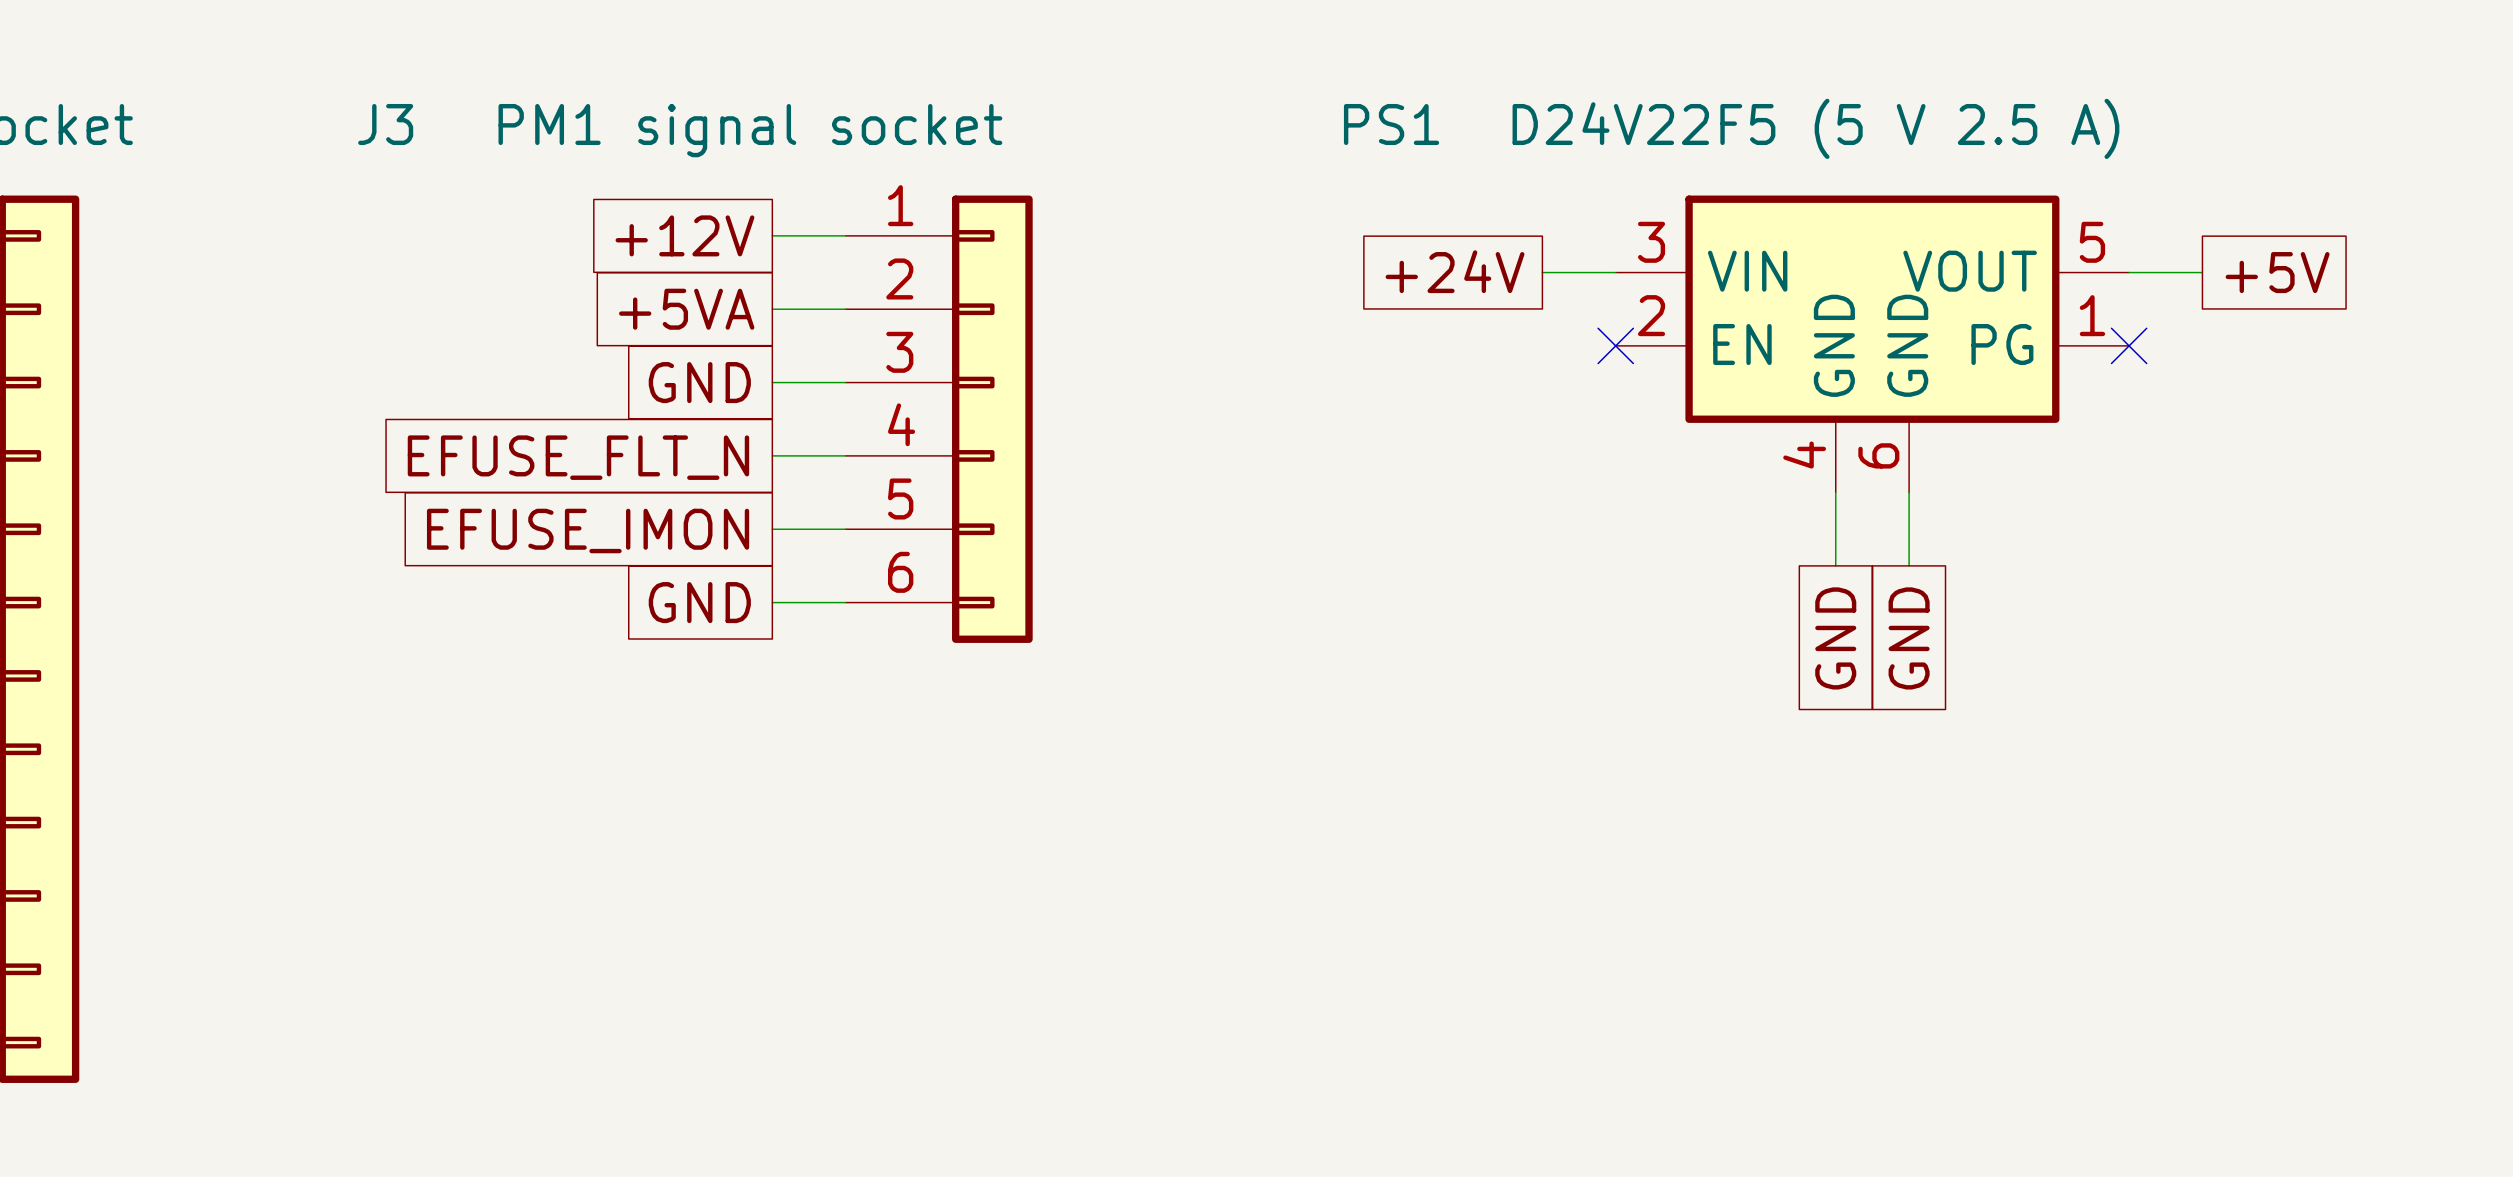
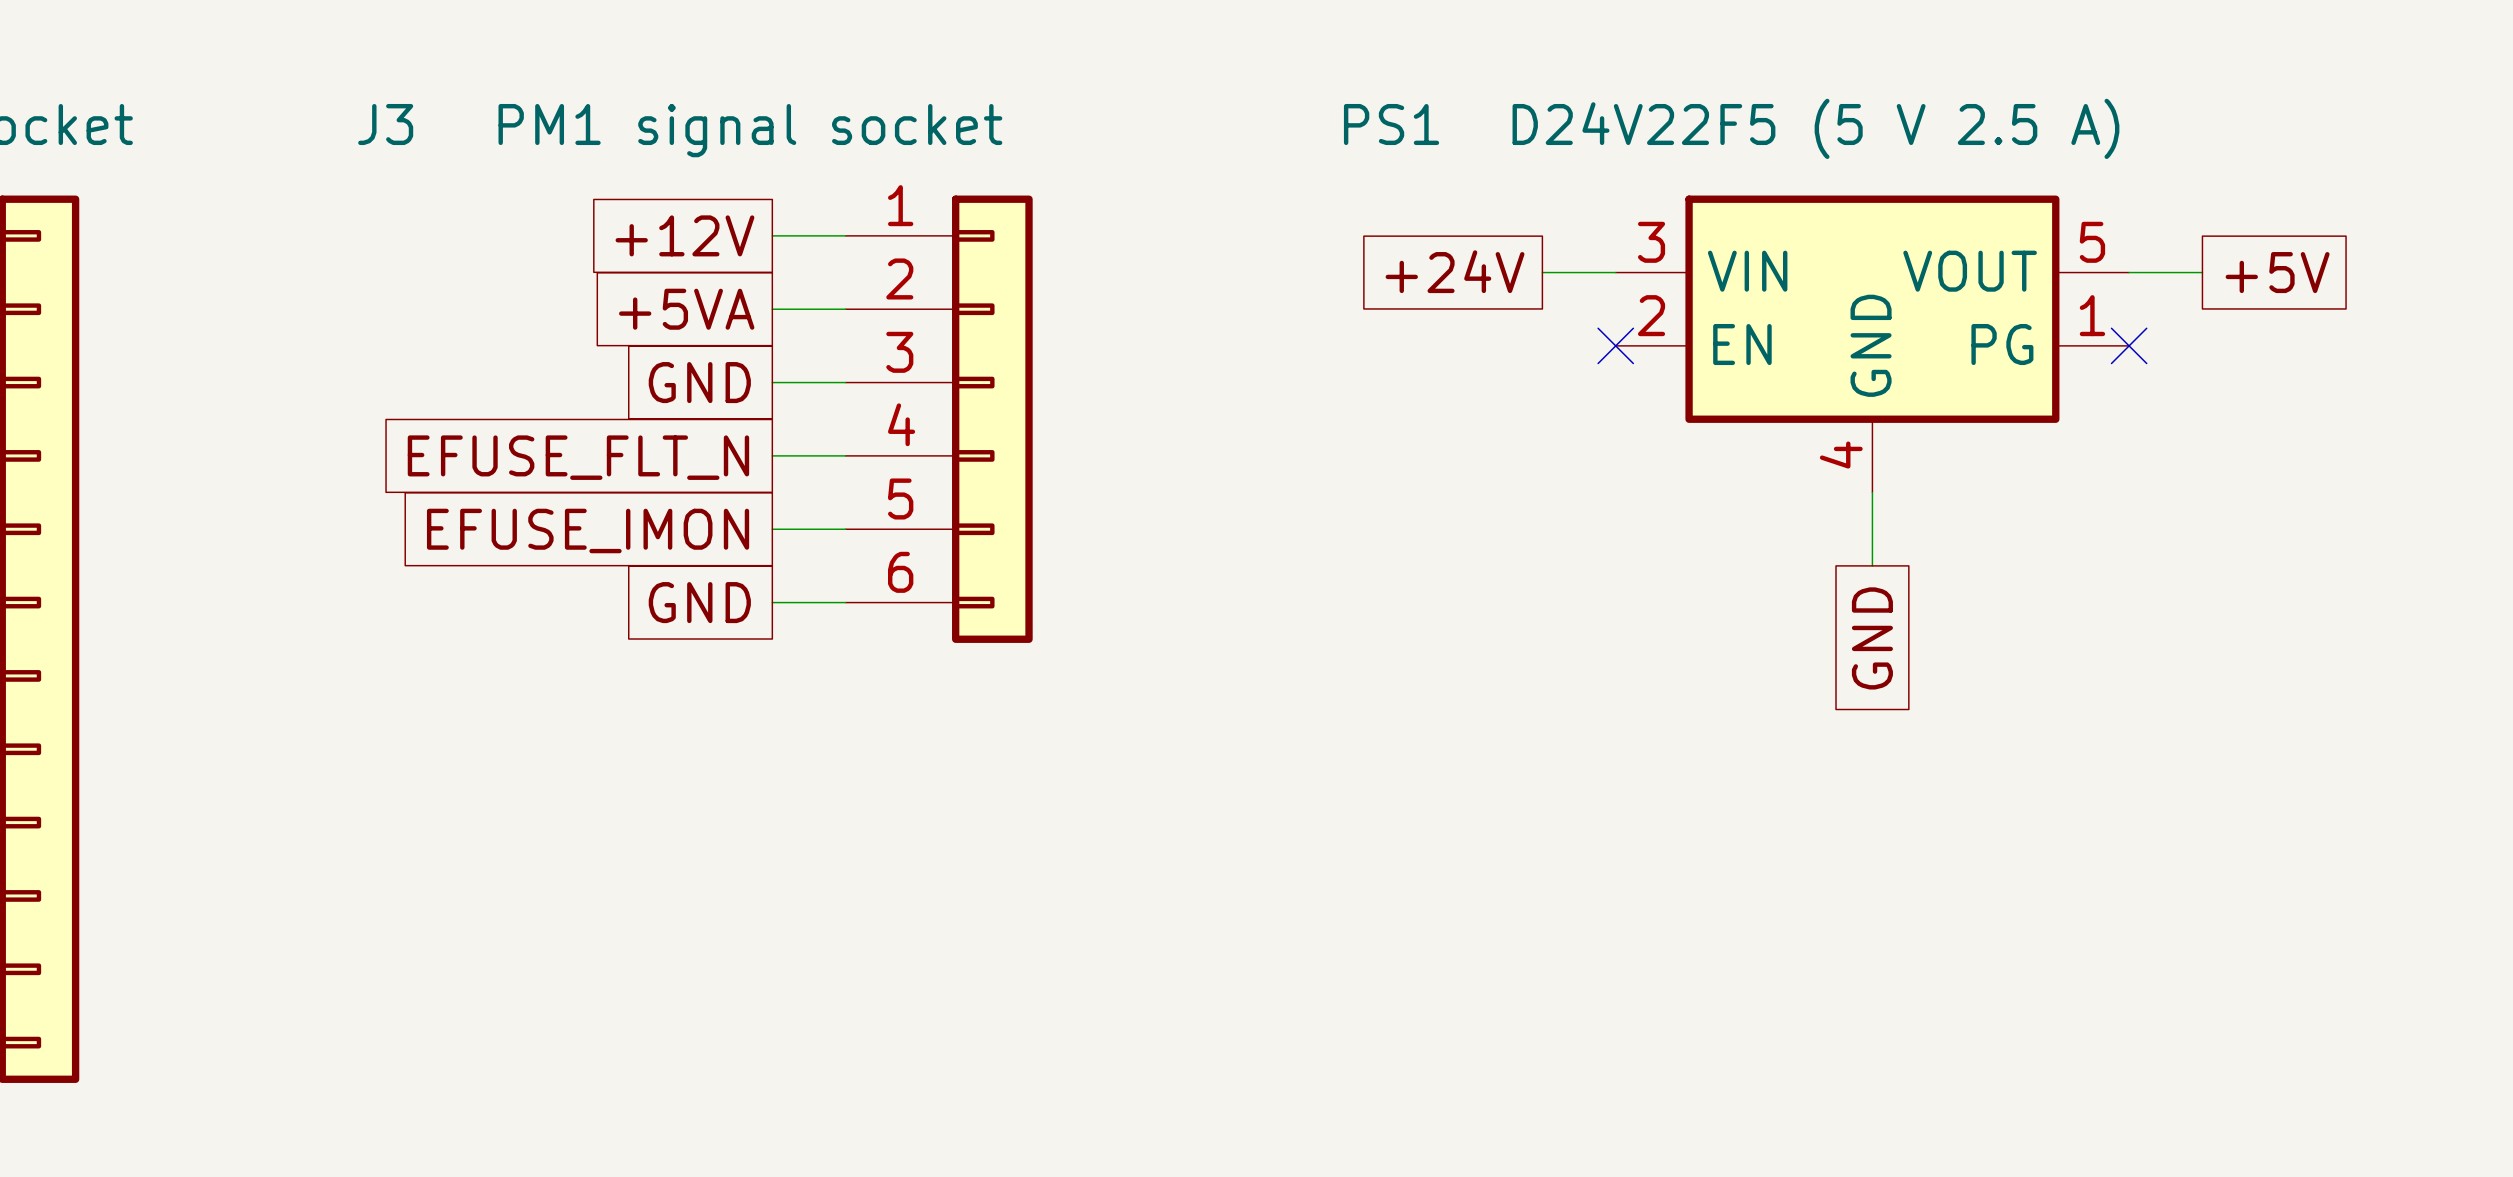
PS1 symbol: [1615, 195, 2130, 493] -> [1615, 195, 2130, 493]
wire: (1835, 492) (1835, 565) -> (1872, 492) (1872, 565)
wire: (1909, 492) (1909, 565) -> none
global label: GND (1835, 638) -> none
global label: none -> GND (1872, 638)
global label: GND (1909, 638) -> none

